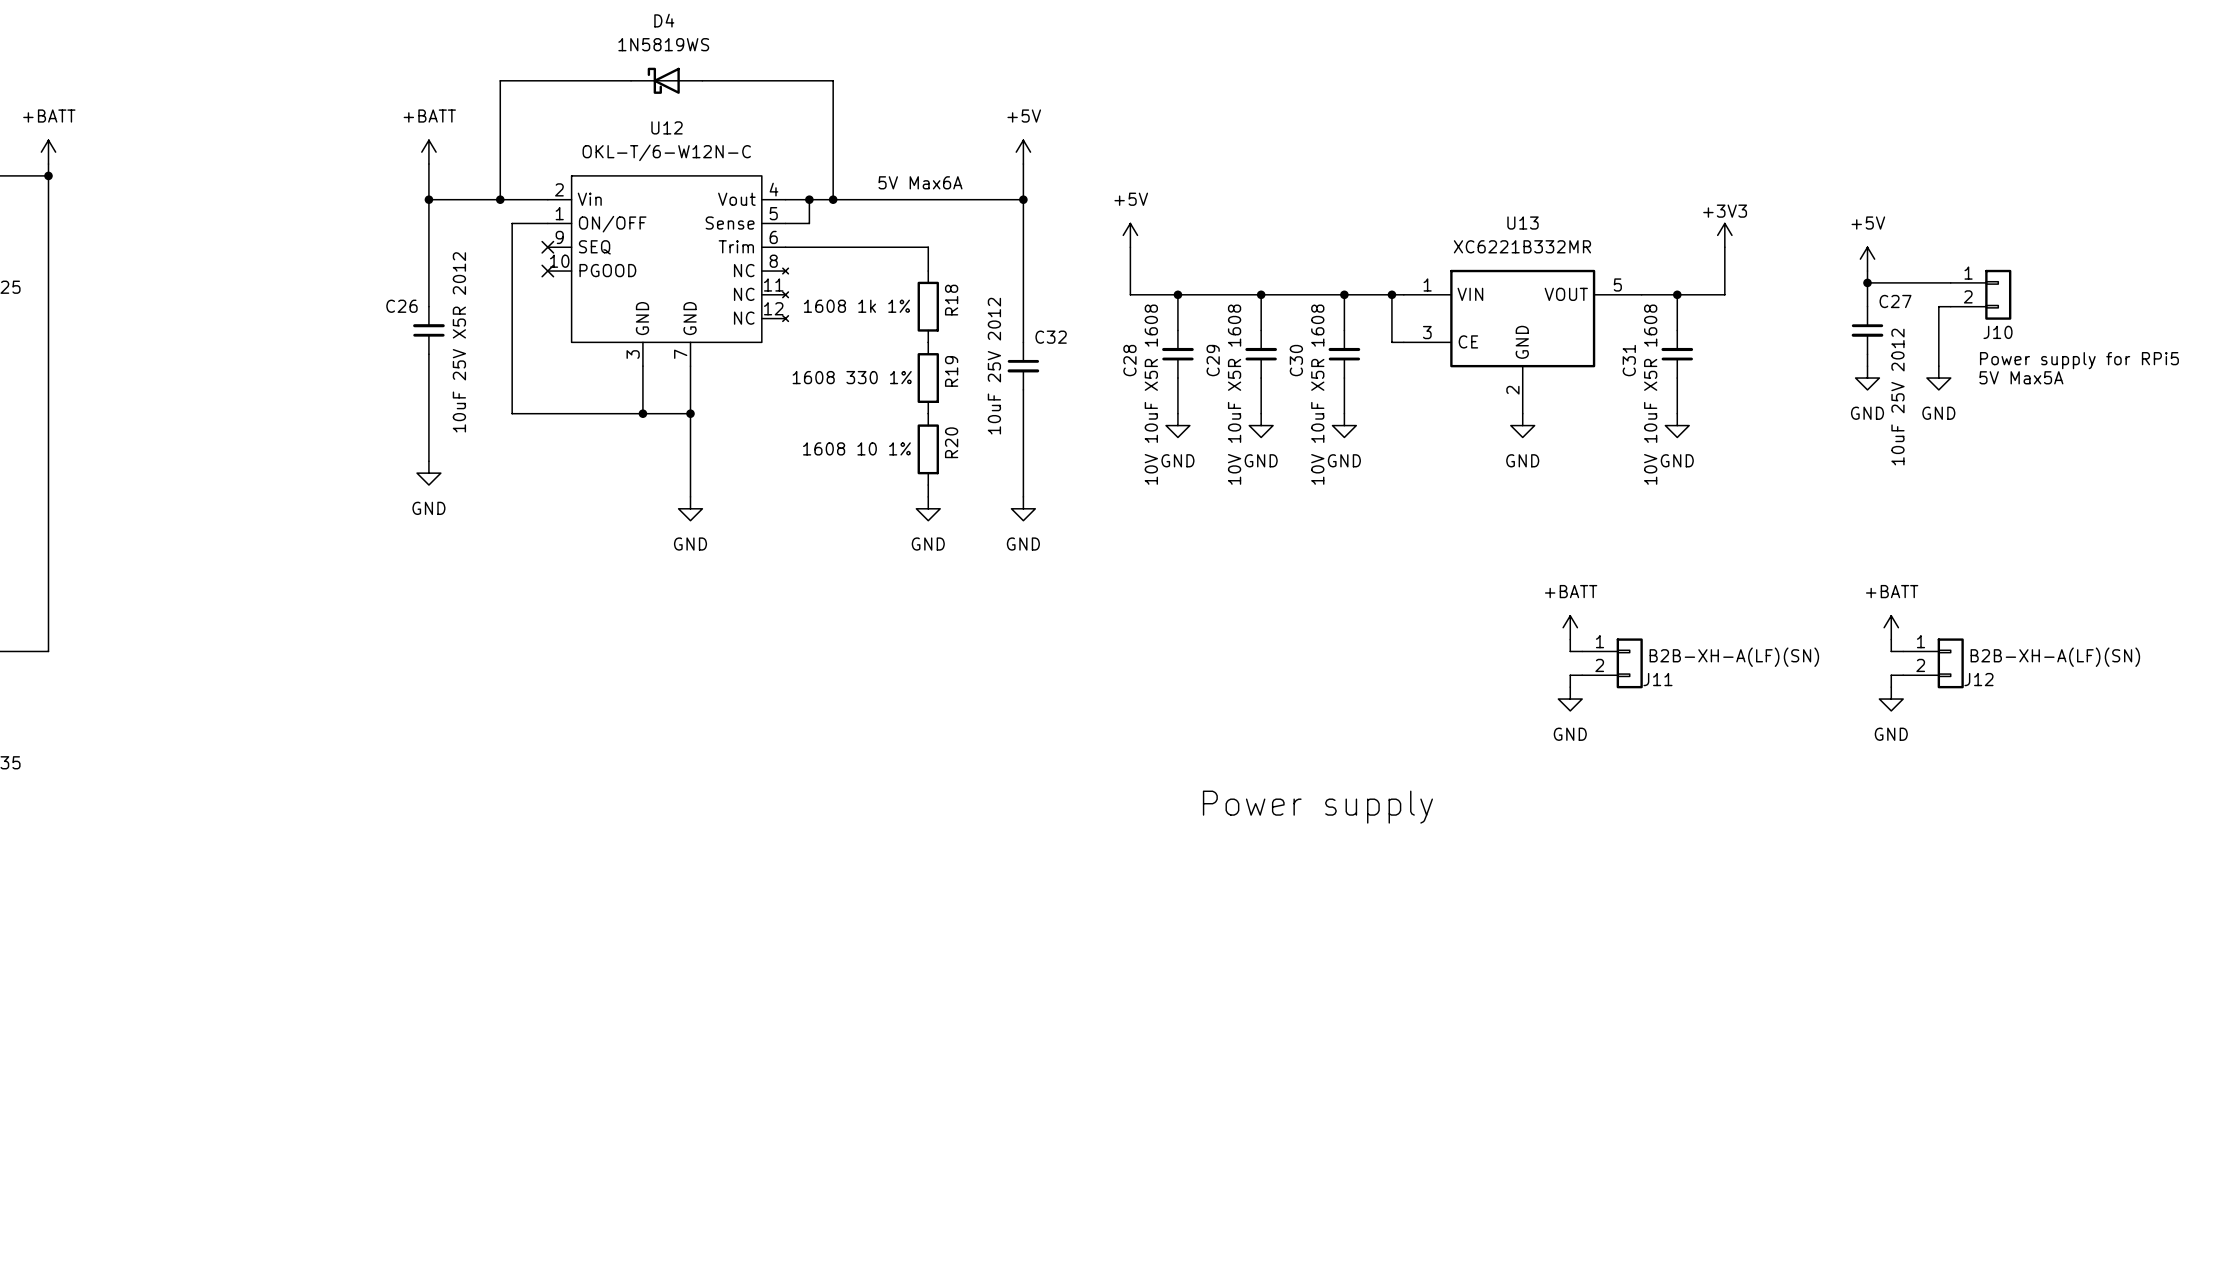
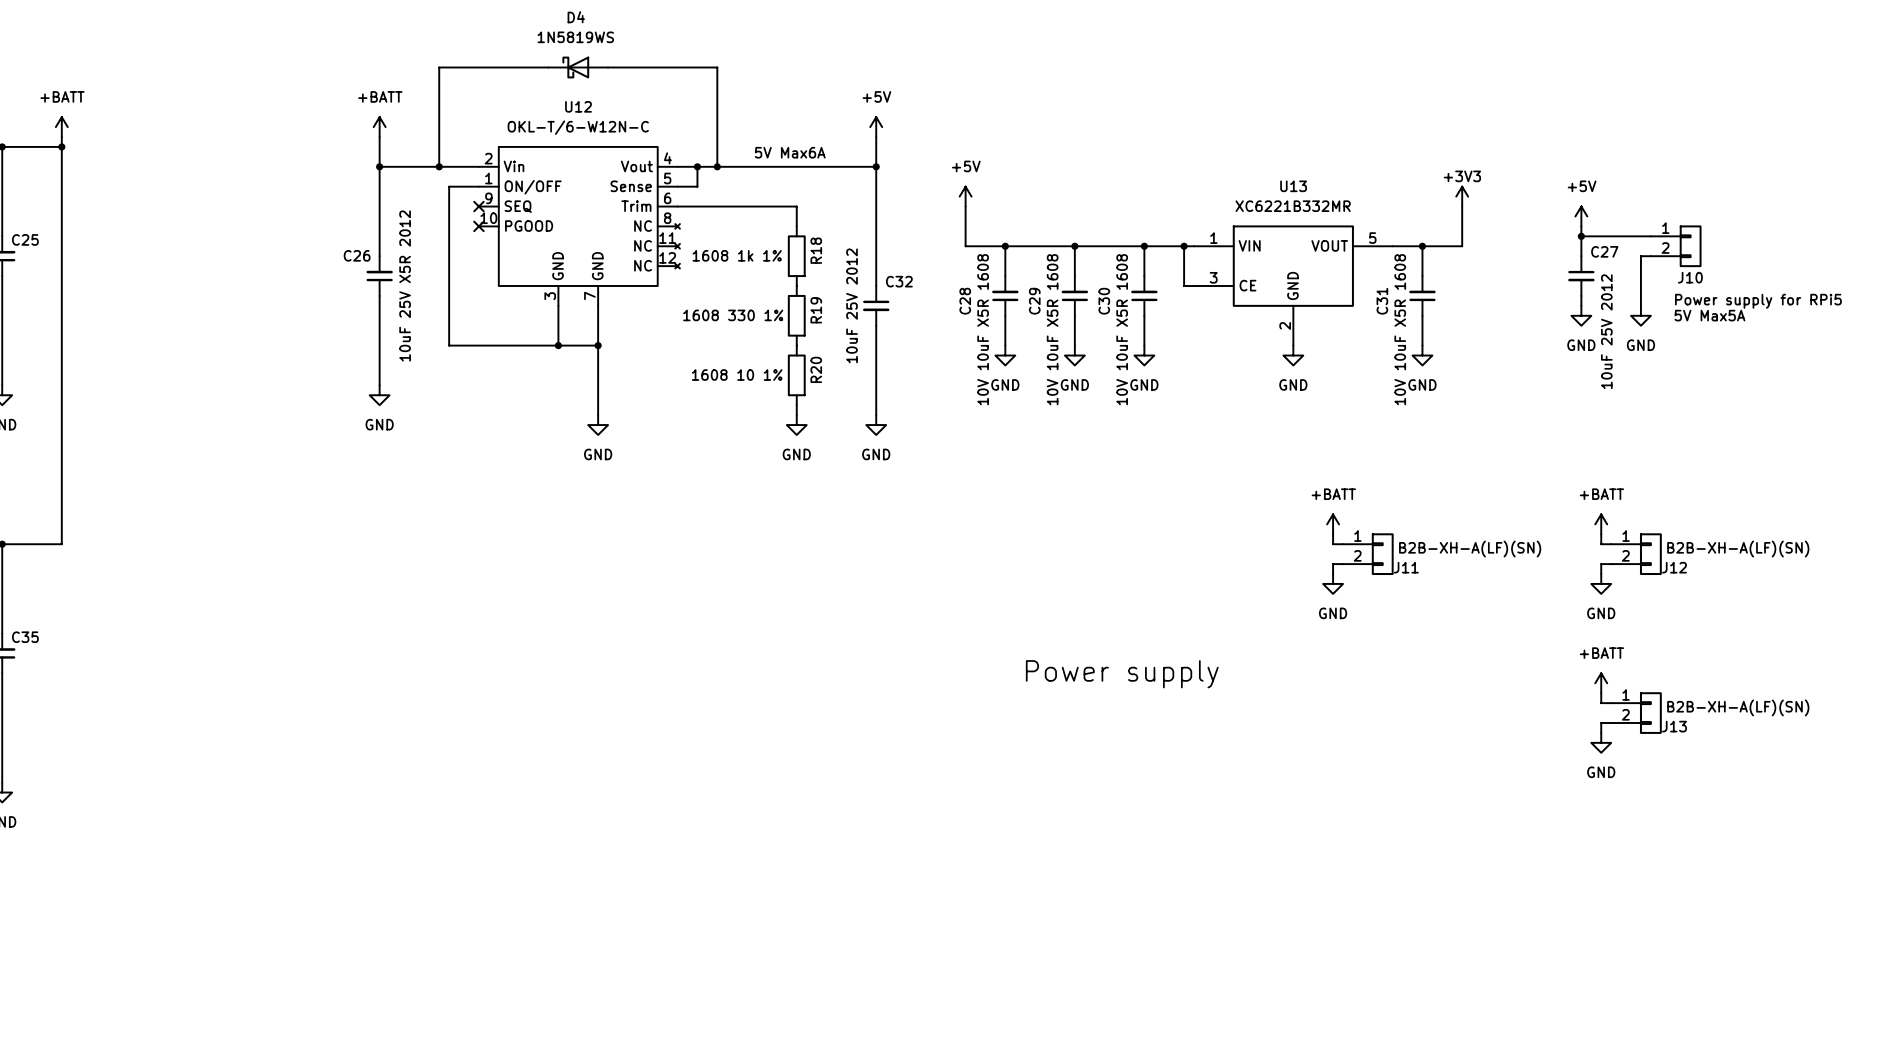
power symbol: none -> +BATT (1601, 683)
wire: none -> (1601, 693) (1601, 703) (1611, 703)
J13: none -> B2B-XH-A(LF)(SN) (1636, 713)
wire: none -> (1611, 722) (1601, 722) (1601, 732)
power symbol: none -> GND (1601, 742)

